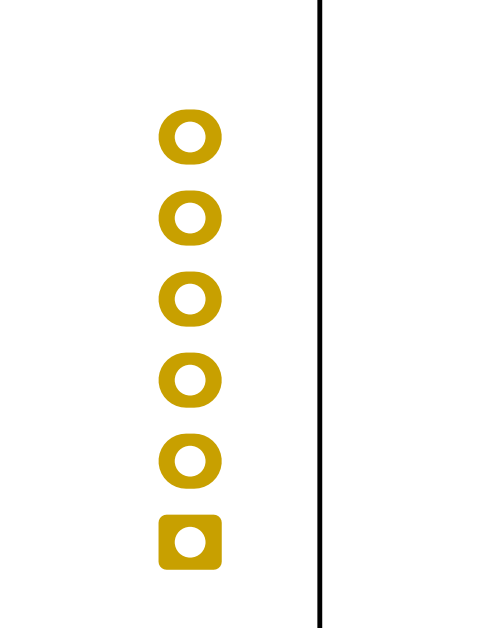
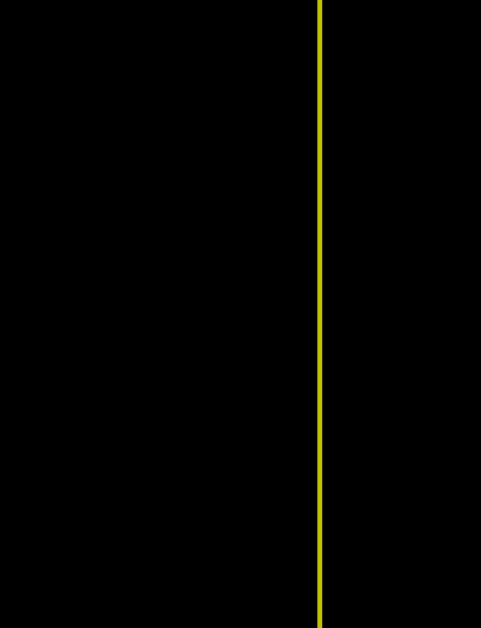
part: (190, 339) -> none

